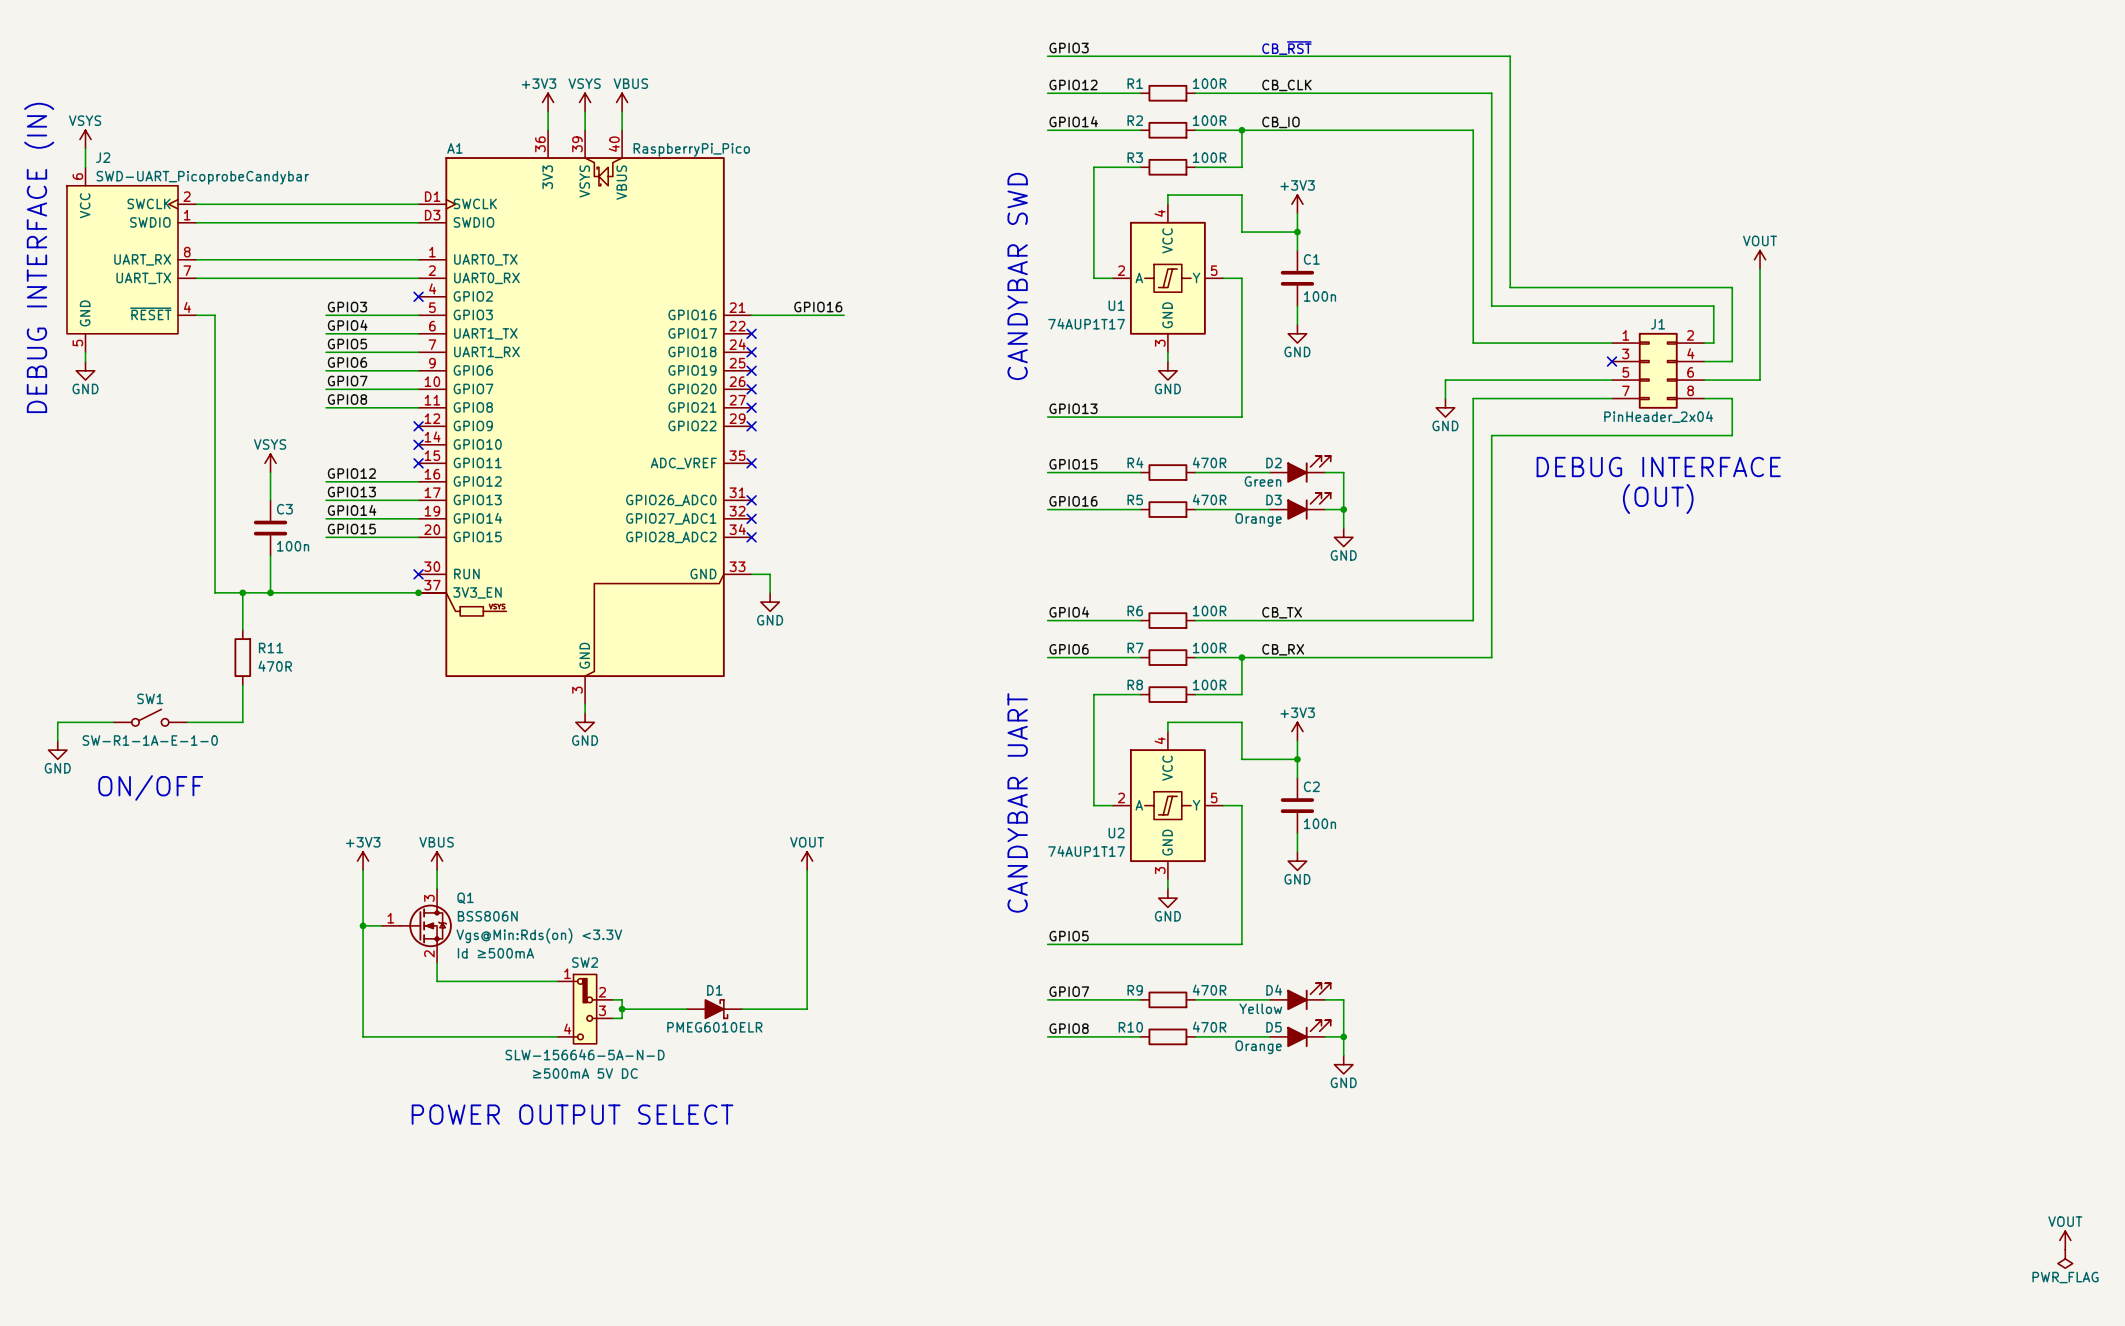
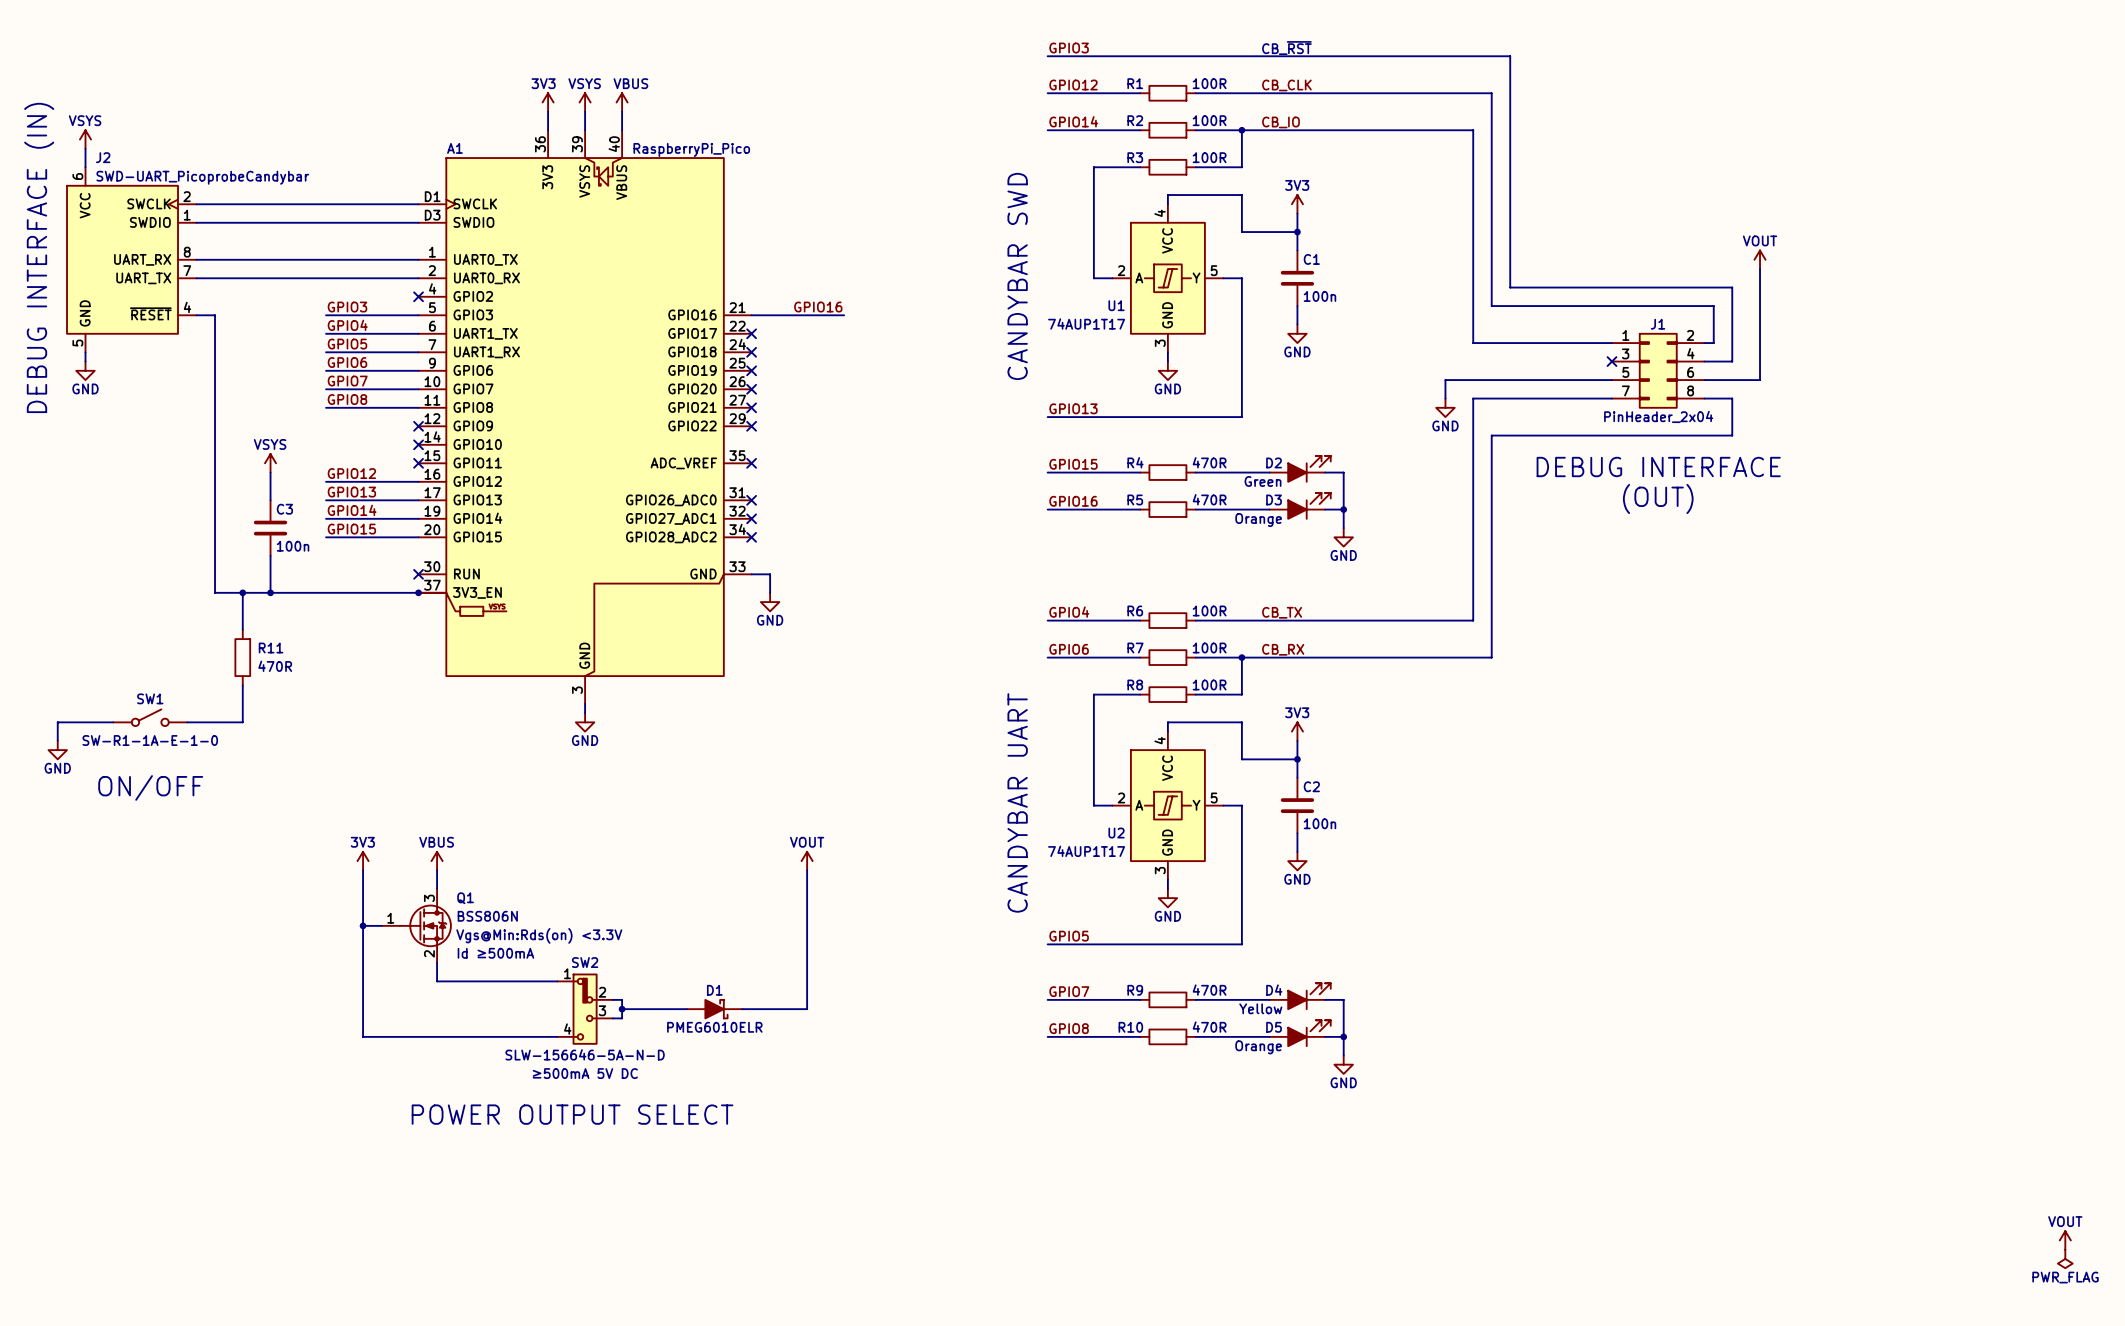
power symbol: +3V3 (548, 102) -> 3V3 (548, 102)
power symbol: +3V3 (1297, 204) -> 3V3 (1297, 204)
power symbol: +3V3 (1297, 731) -> 3V3 (1297, 731)
power symbol: +3V3 (363, 861) -> 3V3 (363, 861)

